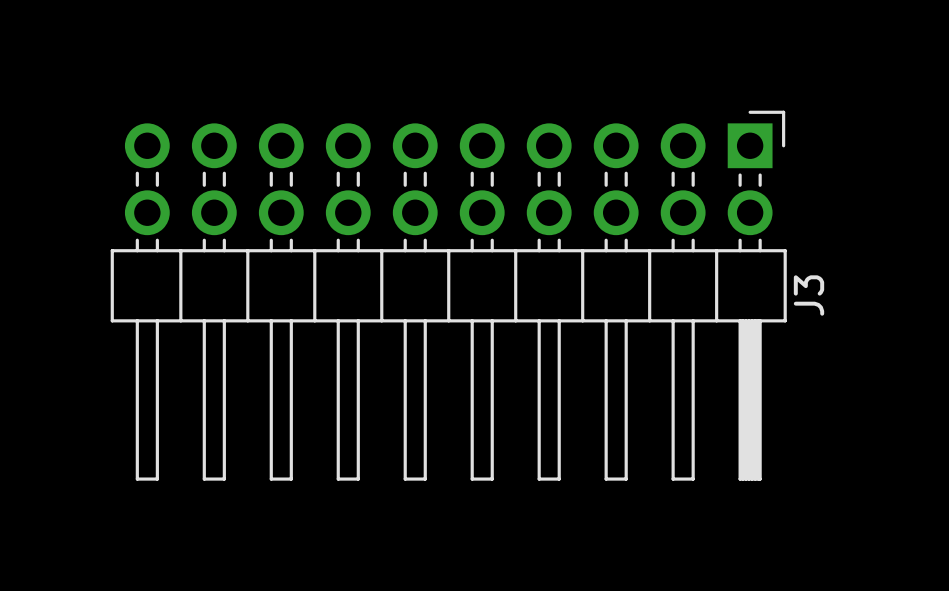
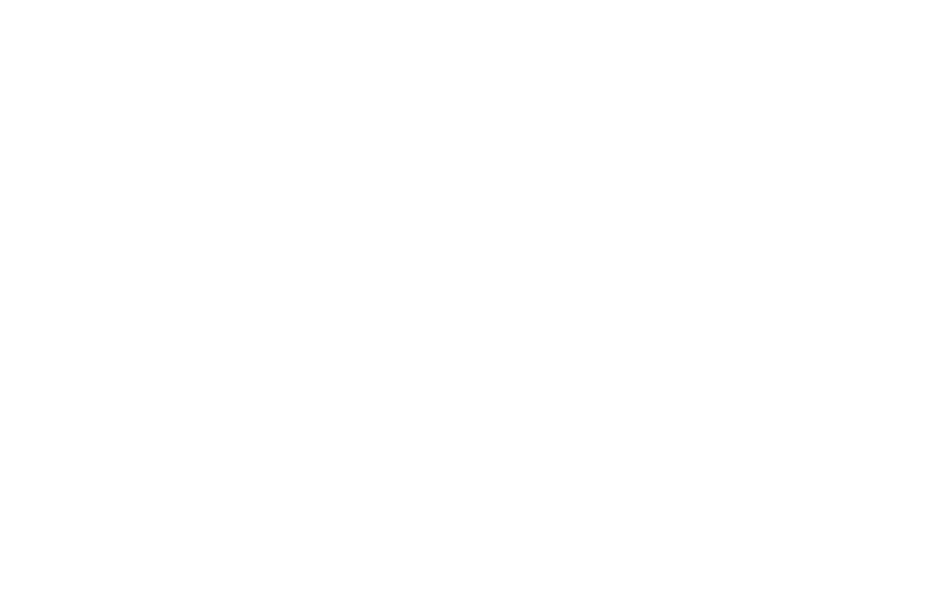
J3: (448, 295) -> none

